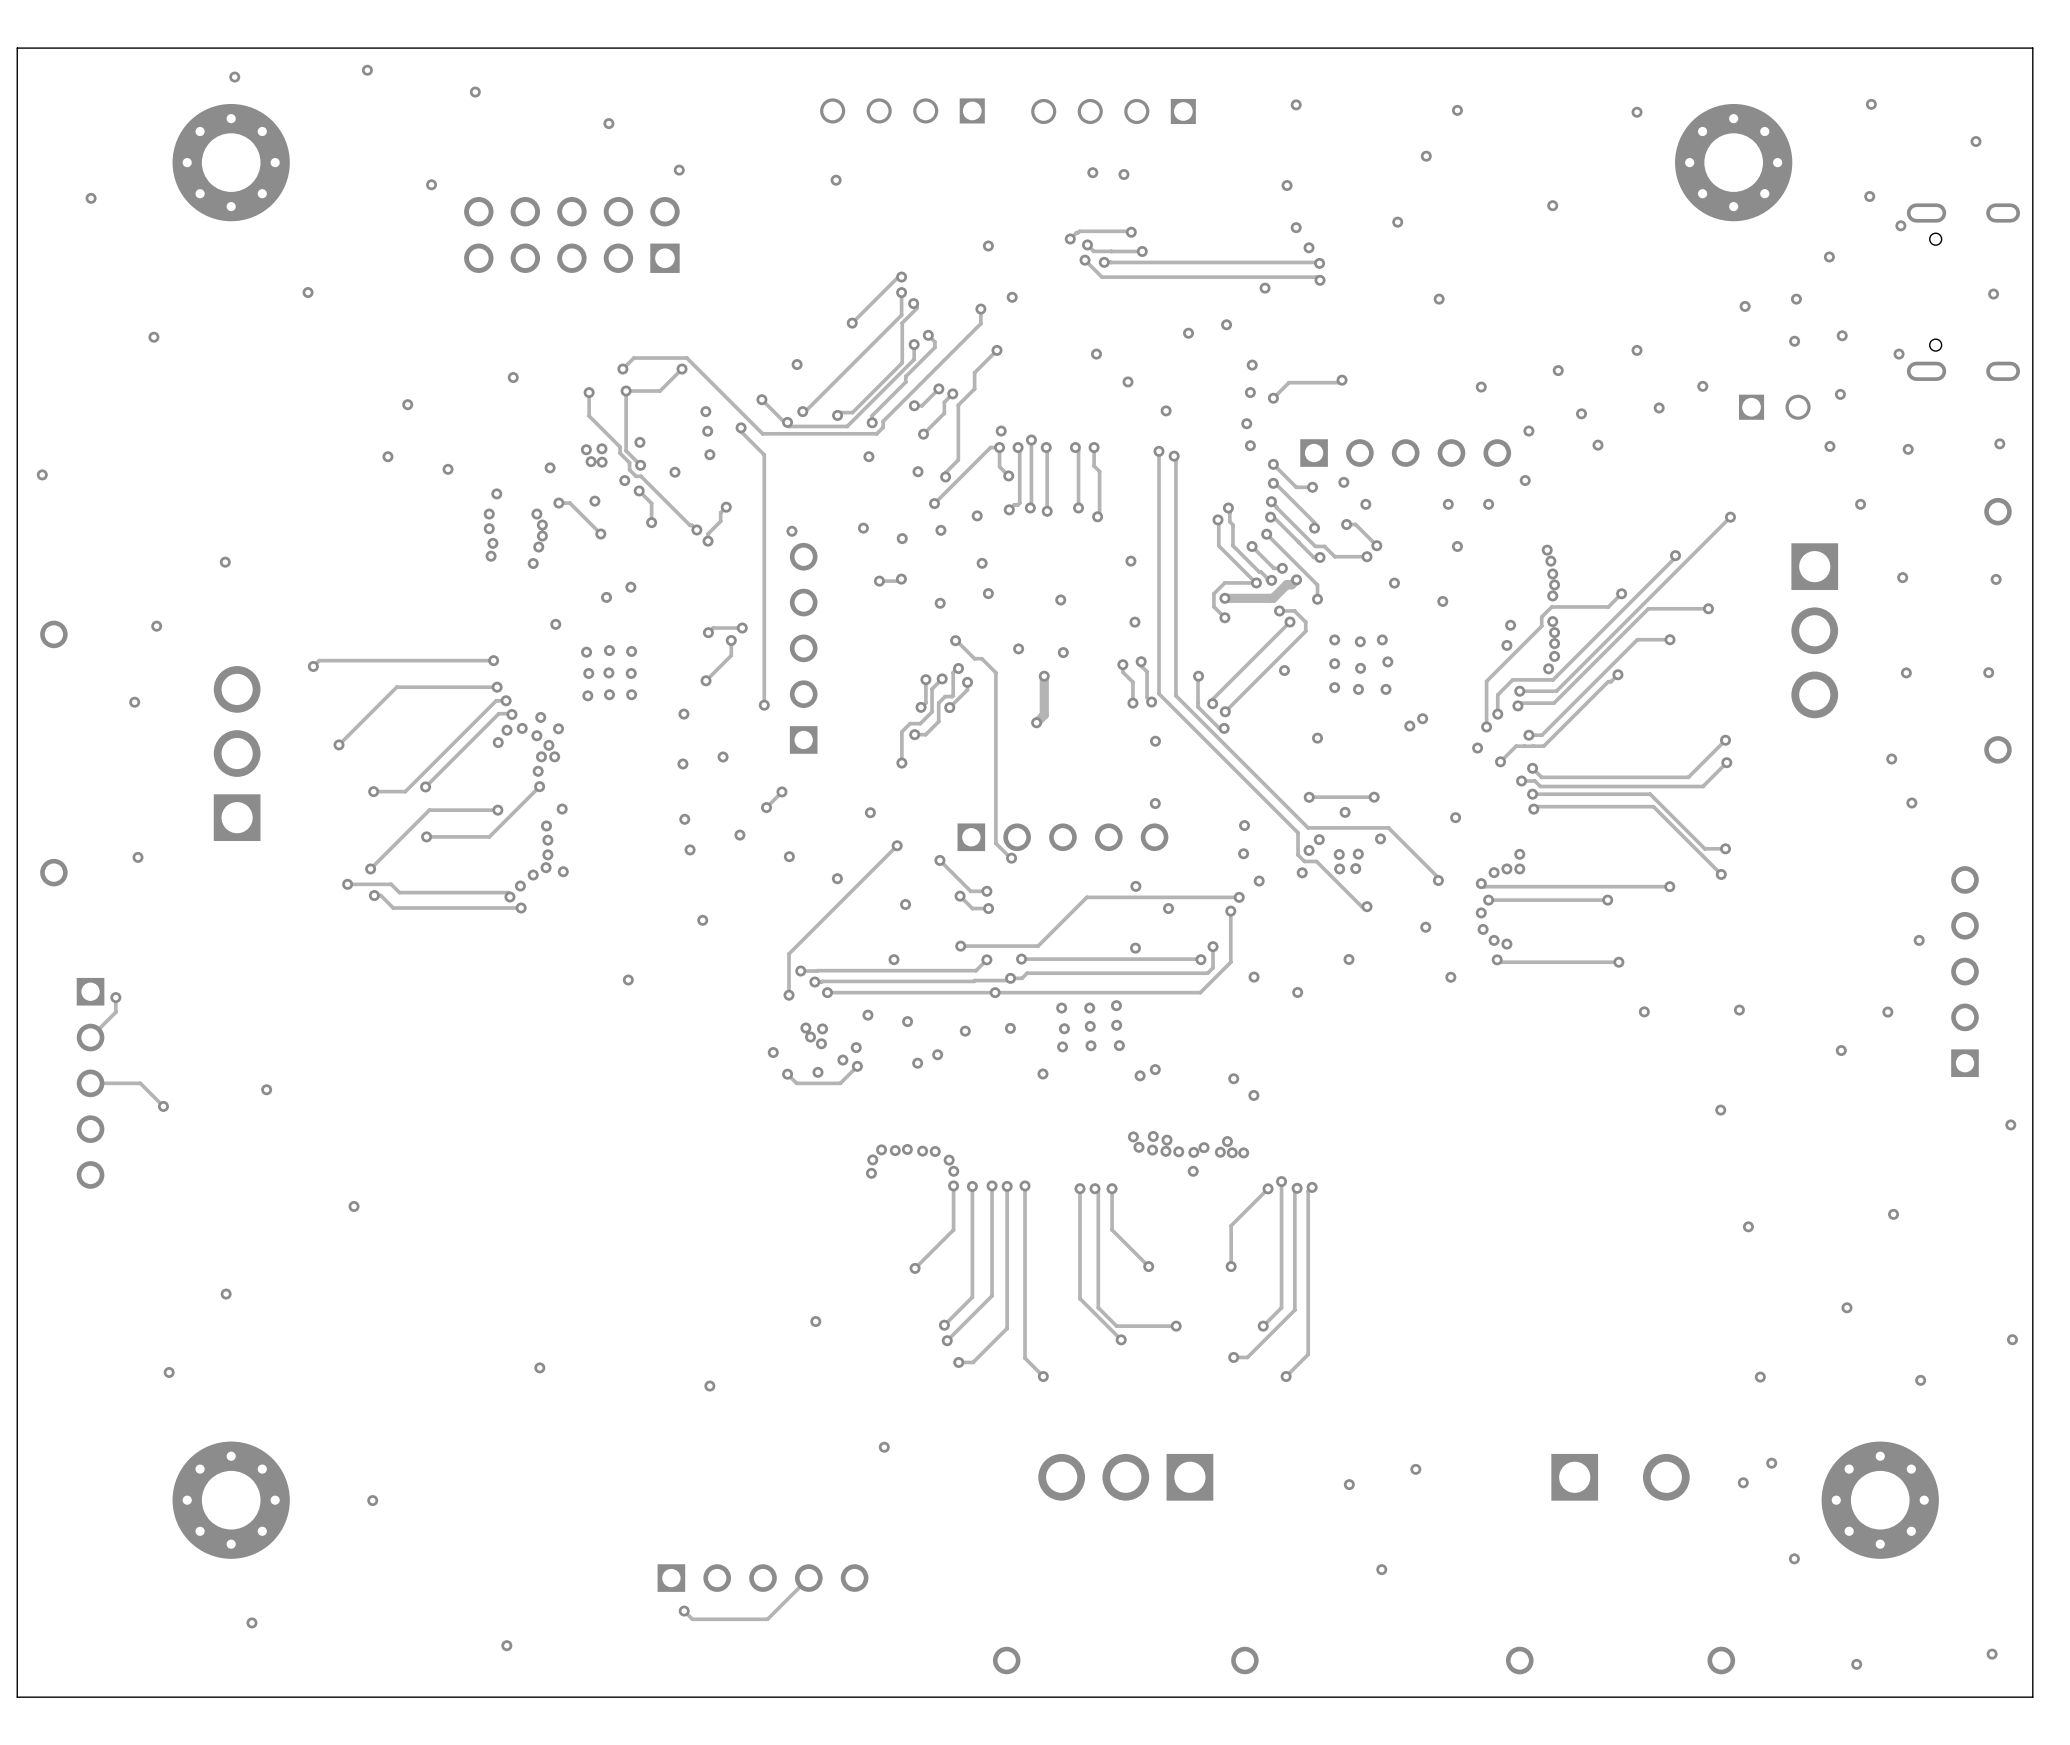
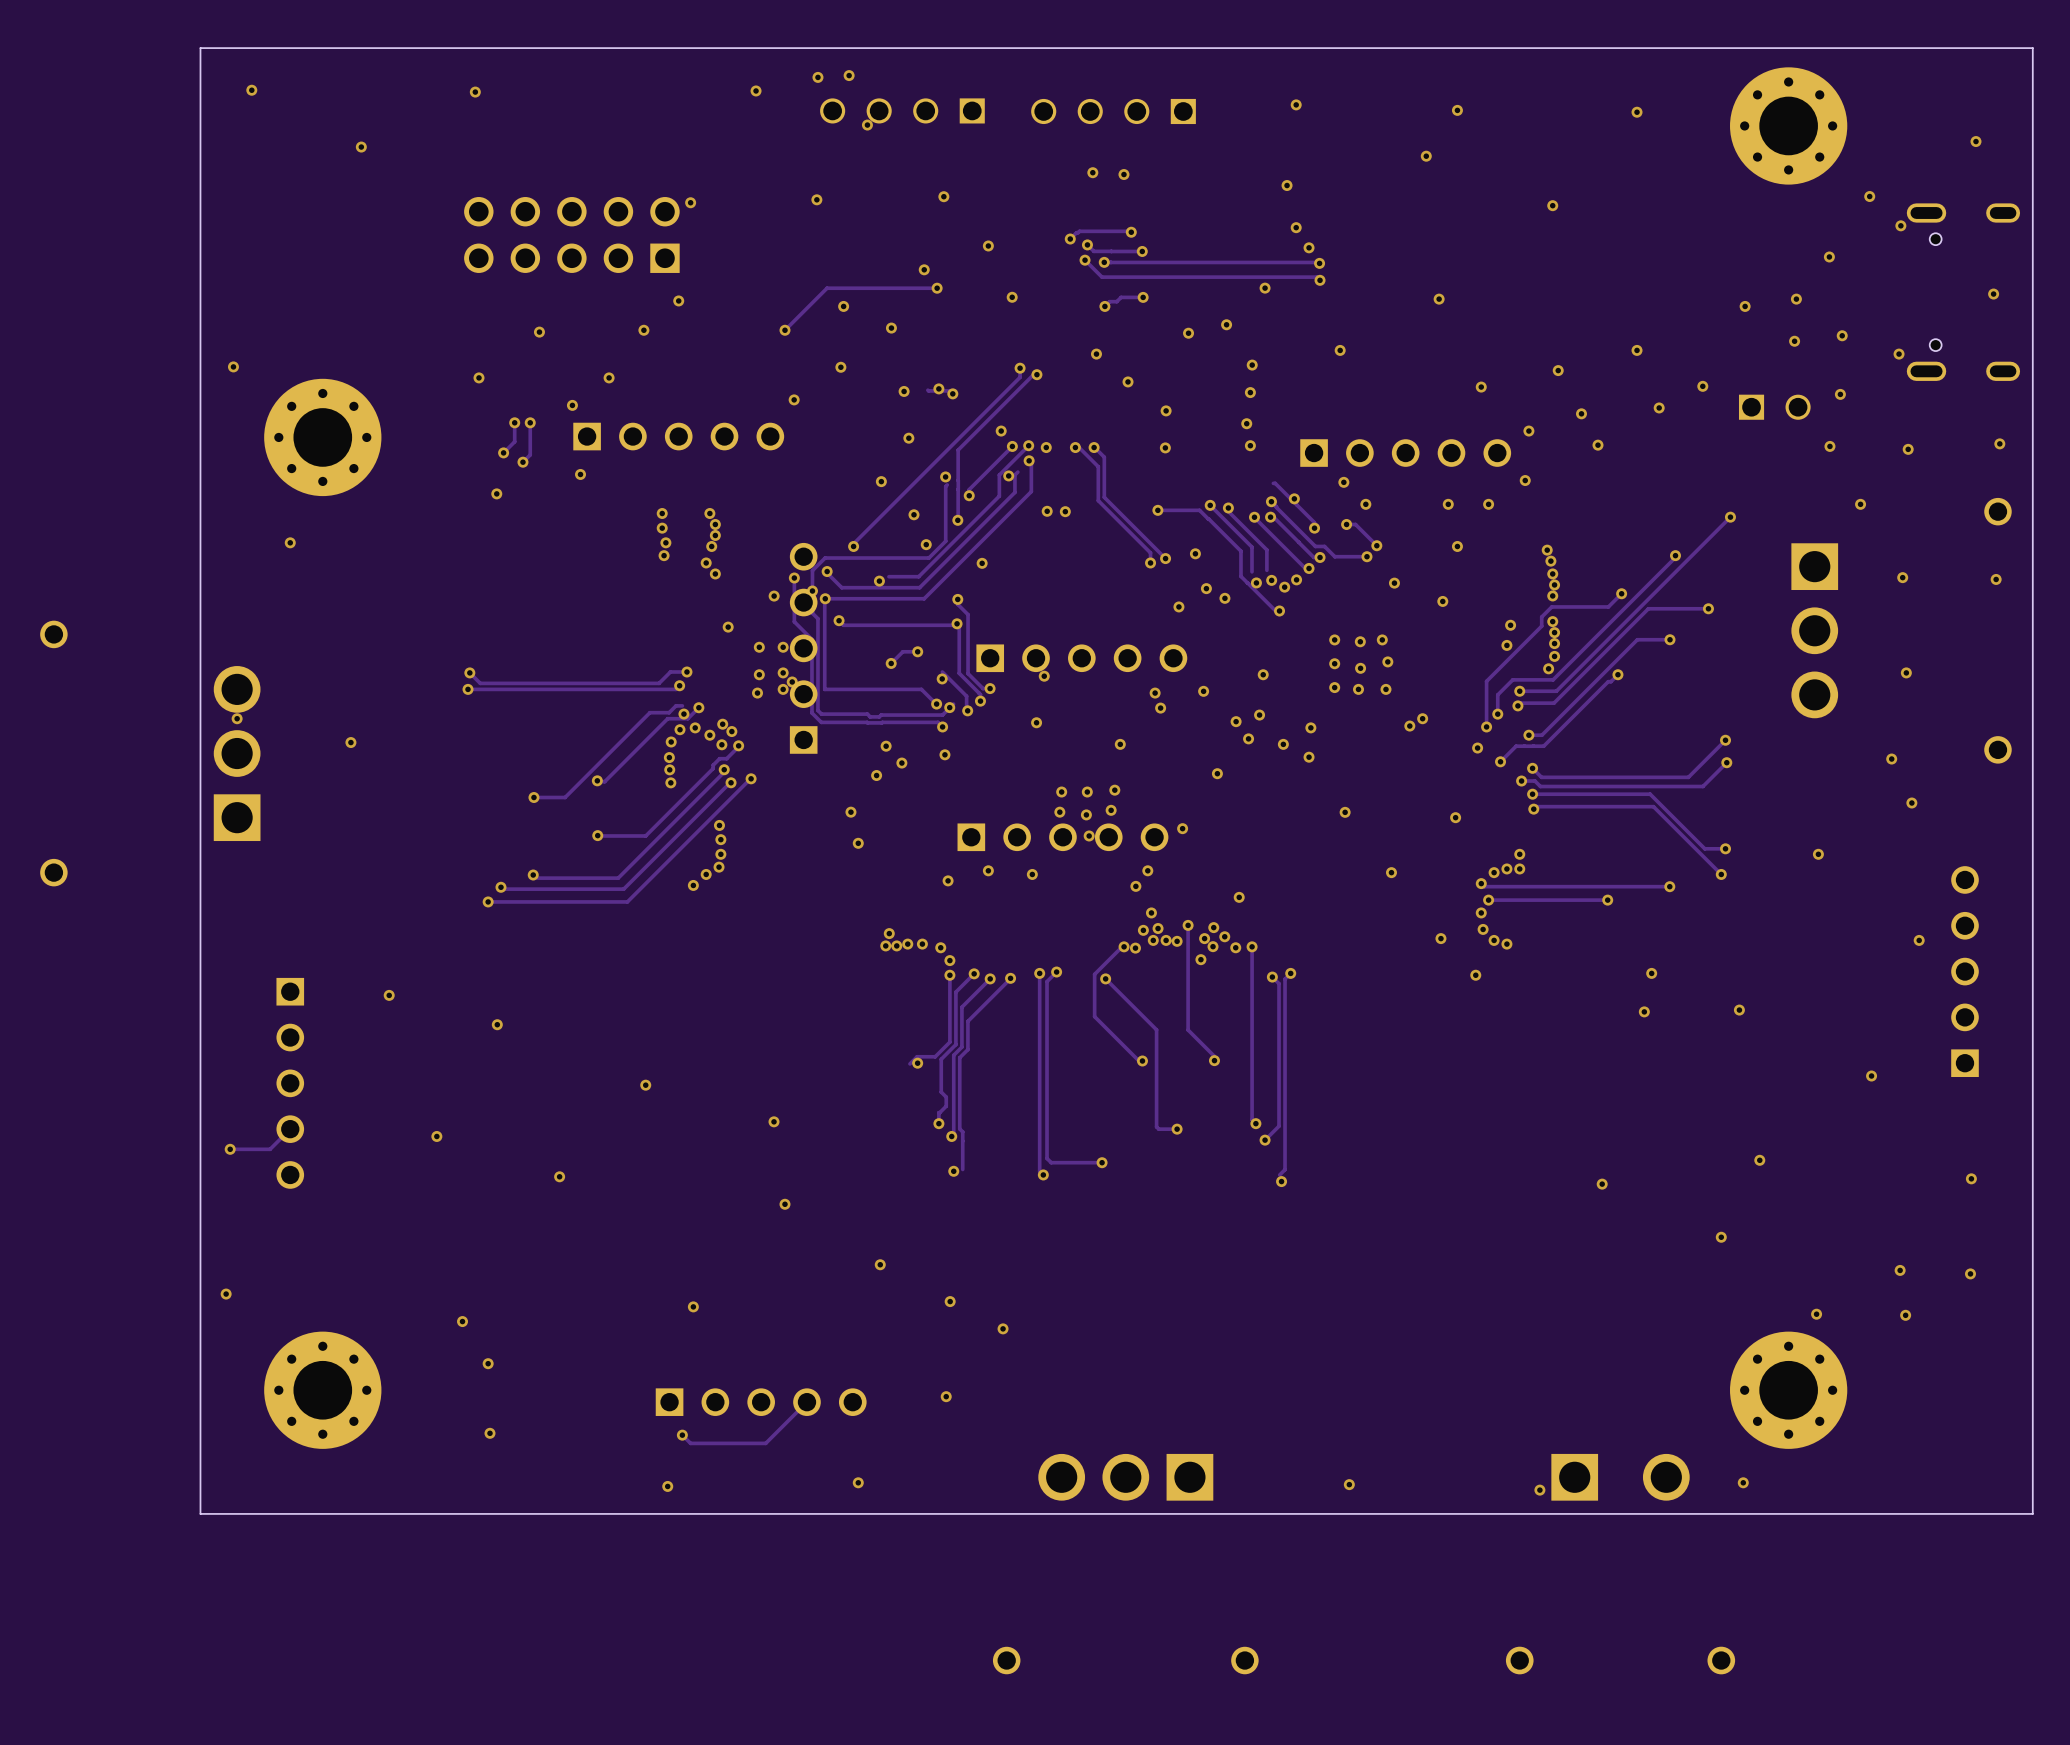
board edge: (200, 48) (17, 48) (17, 1697) (2032, 1697) (2032, 1513) -> (200, 48) (200, 1513) (2032, 1513)
via: (367, 70) -> none
via: none -> (849, 75)
via position: (234, 77) -> (251, 90)
via: none -> (817, 77)
via: none -> (756, 90)
via: (1871, 104) -> none
via: (608, 123) -> none
via: none -> (867, 125)
via: none -> (361, 147)
part position: (231, 162) -> (322, 437)
part position: (1733, 162) -> (1788, 125)
via position: (679, 170) -> (690, 202)
via position: (836, 180) -> (816, 199)
via: (431, 184) -> none
via: none -> (943, 196)
via: (91, 198) -> none
via: (1397, 222) -> none
via: none -> (924, 269)
track: (901, 277) (898, 277) (852, 323) -> none
via: (901, 277) -> none
track: none -> (937, 288) (827, 288) (784, 330)
via: none -> (937, 288)
via: (308, 292) -> none
track: (901, 292) (901, 315) (805, 411) (802, 411) -> none
via: (901, 292) -> none
track: none -> (1143, 297) (1121, 297) (1116, 301) (1109, 301) (1104, 306)
via: none -> (1143, 297)
via: none -> (678, 300)
track: (913, 303) (916, 308) (902, 323) (902, 362) (852, 412) (840, 412) (837, 415) -> none
via: (913, 303) -> none
via: none -> (1104, 306)
track: (980, 309) (980, 323) (883, 421) (883, 427) (876, 433) (762, 433) (686, 358) (633, 358) (622, 369) -> none
via: (980, 309) -> none
via position: (852, 323) -> (843, 306)
via: none -> (891, 328)
via: none -> (643, 330)
via: none -> (784, 330)
via: none -> (539, 332)
track: (928, 335) (934, 341) (934, 347) (905, 376) (905, 382) (872, 415) (872, 422) -> none
via: (928, 335) -> none
via: (153, 337) -> none
track: (914, 344) (914, 359) (847, 426) (788, 426) (761, 399) -> none
via: (914, 344) -> none
track: (996, 350) (974, 372) (974, 388) (958, 405) (958, 459) (945, 472) (945, 476) -> none
via: (996, 350) -> none
via: (797, 364) -> none
via: none -> (233, 366)
via: none -> (840, 367)
track: none -> (1020, 368) (1020, 377) (853, 543) (853, 546)
via: none -> (1020, 368)
via: (622, 369) -> none
track: (682, 369) (660, 391) (626, 391) (626, 450) (640, 465) -> none
via: (682, 369) -> none
track: none -> (1036, 374) (1033, 374) (958, 450) (957, 520)
via: none -> (1036, 374)
via: none -> (478, 377)
via: (513, 377) -> none
via: none -> (609, 377)
track: (1342, 380) (1339, 382) (1288, 382) (1273, 398) -> none
via position: (1342, 380) -> (1340, 350)
track: (938, 388) (922, 405) (914, 405) -> none
track: none -> (927, 390) (949, 390)
via: (626, 391) -> none
via: none -> (904, 391)
track: (589, 392) (589, 416) (620, 447) (620, 453) (629, 462) (629, 469) (636, 476) (640, 476) (696, 529) -> none
via: (589, 392) -> none
track: (952, 393) (944, 402) (944, 413) (923, 434) -> none
via: (1273, 398) -> none
via: (761, 399) -> none
via: none -> (794, 399)
via: (407, 404) -> none
via: none -> (572, 405)
via: (914, 405) -> none
via: (705, 411) -> none
via: (802, 411) -> none
via: (837, 415) -> none
track: none -> (514, 422) (514, 441) (503, 452)
via: none -> (514, 422)
track: none -> (530, 422) (530, 454) (522, 462)
via: none -> (530, 422)
via: (787, 422) -> none
via: (872, 422) -> none
track: (741, 427) (741, 431) (764, 454) (764, 705) -> none
via: (741, 427) -> none
via: (707, 431) -> none
via position: (923, 434) -> (908, 438)
part: none -> (678, 436)
track: (1031, 440) (1030, 507) -> none
via: (1031, 440) -> none
via: (639, 442) -> none
track: none -> (1028, 445) (999, 475) (999, 496) (918, 576) (888, 576)
via: none -> (1028, 445)
track: none -> (1012, 446) (969, 489) (969, 495)
via: none -> (1012, 446)
via: (999, 447) -> none
track: (1018, 447) (1019, 449) (1019, 503) (1009, 509) -> none
via: (1018, 447) -> none
track: (1046, 447) (1047, 511) -> none
track: (1075, 447) (1078, 450) (1078, 507) -> none
track: none -> (1076, 447) (1079, 447) (1098, 466) (1098, 500) (1150, 552) (1150, 562)
track: (1094, 447) (1094, 466) (1099, 471) (1099, 514) (1097, 516) -> (1094, 447) (1104, 457) (1104, 497) (1165, 558)
via: none -> (1165, 447)
via: (601, 448) -> none
via: (586, 449) -> none
track: (1159, 451) (1159, 693) (1298, 832) (1298, 855) (1304, 861) (1316, 861) (1361, 906) (1367, 906) -> none
via: (1159, 451) -> none
via: none -> (503, 452)
via: (709, 454) -> none
via: (387, 456) -> none
via: (868, 456) -> none
track: (1174, 456) (1175, 457) (1175, 695) (1308, 827) (1388, 827) (1438, 877) (1438, 880) -> none
via: (1174, 456) -> none
track: none -> (1029, 460) (1031, 463) (1031, 491) (924, 598) (825, 598) (823, 600)
via: none -> (1029, 460)
via: (591, 461) -> none
via: none -> (522, 462)
via: (602, 462) -> none
track: (1273, 464) (1296, 487) (1312, 487) -> none
via: (1273, 464) -> none
via: (640, 465) -> none
via: (550, 467) -> none
via: (448, 469) -> none
via: (918, 471) -> none
via: (674, 472) -> none
track: none -> (1017, 472) (1014, 474) (1014, 492) (919, 587) (841, 587) (827, 571)
via: (42, 474) -> none
via: none -> (580, 474)
track: (1008, 475) (999, 466) (999, 447) (990, 447) (934, 503) -> none
via: (624, 480) -> none
via: none -> (881, 481)
via: (1273, 483) -> none
track: none -> (947, 484) (945, 541) (928, 558) (825, 558) (812, 570) (812, 605) (812, 613) (817, 618) (817, 710) (821, 714) (867, 714) (870, 716) (879, 716) (881, 715) (942, 715) (953, 704)
via: (1312, 487) -> none
track: (639, 490) (651, 503) (651, 522) -> none
via: (639, 490) -> none
via: none -> (969, 495)
via: none -> (1294, 498)
via: (594, 501) -> none
track: (558, 503) (569, 503) (600, 534) -> none
via: (558, 503) -> none
via: (934, 503) -> none
track: none -> (1210, 505) (1251, 547) (1251, 571)
track: (726, 507) (720, 512) (720, 521) (708, 533) (708, 541) -> none
via: (726, 507) -> none
via: (1030, 507) -> none
via position: (1078, 507) -> (1065, 511)
via: (1009, 509) -> none
via: none -> (1157, 510)
track: (1228, 511) (1229, 521) (1232, 524) (1232, 545) (1267, 580) -> (1228, 511) (1266, 549) (1266, 570)
via: none -> (662, 513)
via: none -> (709, 513)
via: (489, 514) -> none
via: (536, 514) -> none
via: none -> (913, 514)
via: (977, 515) -> none
via: (1097, 516) -> none
track: (1218, 517) (1218, 545) (1254, 581) (1258, 581) (1247, 582) -> (1157, 510) (1199, 510) (1240, 551) (1240, 576) (1247, 582)
track: none -> (1254, 517) (1305, 568) (1309, 568)
via: none -> (1254, 517)
via position: (1217, 519) -> (1210, 505)
via: none -> (957, 520)
via: (651, 522) -> none
via: none -> (715, 524)
via: (542, 525) -> none
via: (489, 528) -> none
via: none -> (662, 528)
via position: (863, 528) -> (853, 546)
via: (696, 529) -> none
via: (940, 530) -> none
via: (791, 531) -> none
via: (600, 534) -> none
track: (1266, 534) (1317, 585) (1317, 599) -> none
via: (1266, 534) -> none
via: none -> (715, 535)
via: (542, 536) -> none
via: (902, 538) -> none
via: (708, 541) -> none
via: none -> (290, 542)
via: none -> (665, 542)
via: (492, 543) -> none
via: none -> (926, 544)
via: none -> (711, 546)
track: (1252, 546) (1273, 568) (1282, 568) -> none
via: (1252, 546) -> none
via: (538, 547) -> none
via: none -> (1195, 553)
via: none -> (664, 555)
via: (491, 556) -> none
via: none -> (1165, 558)
via: (1130, 561) -> none
via: (225, 562) -> none
via: none -> (706, 562)
via: none -> (1150, 562)
via: (533, 563) -> none
via: (1282, 568) -> none
via: none -> (1309, 568)
via: none -> (827, 571)
via: none -> (715, 573)
track: none -> (794, 578) (794, 621) (811, 639) (811, 712) (821, 722) (938, 722) (942, 726)
via: none -> (794, 578)
track: (901, 579) (899, 581) (879, 581) -> none
via: (901, 579) -> none
track: (1296, 579) (1291, 584) (1286, 584) (1273, 598) (1224, 598) -> none
track: (1247, 582) (1224, 582) (1213, 593) (1213, 606) (1224, 617) -> (1247, 582) (1279, 614)
via: (630, 587) -> none
via: none -> (1284, 587)
via: none -> (1206, 588)
via: none -> (812, 591)
via: (988, 593) -> none
via: none -> (774, 596)
via: (606, 597) -> none
via: none -> (825, 598)
track: none -> (957, 599) (957, 604) (968, 614) (968, 673) (983, 688) (990, 688)
via: none -> (957, 599)
via: (1060, 599) -> none
via: (1317, 599) -> none
track: none -> (823, 601) (824, 602) (824, 689) (921, 689) (936, 704)
via: (940, 603) -> none
via: none -> (1178, 606)
track: (1279, 610) (1294, 610) (1305, 622) (1305, 631) (1225, 711) -> none
via: (1224, 617) -> none
track: none -> (839, 620) (843, 625) (957, 623) (959, 626) (959, 673) (980, 694) (980, 701)
via: none -> (839, 620)
via: (1134, 622) -> none
track: (1290, 622) (1212, 699) (1212, 703) -> none
via: (1290, 622) -> none
via: none -> (957, 623)
via: (555, 624) -> none
via: (156, 626) -> none
via: none -> (728, 627)
track: (742, 628) (713, 628) (708, 632) -> none
via: (742, 628) -> none
via: (708, 632) -> none
track: (731, 640) (731, 655) (706, 680) -> none
via: (731, 640) -> none
track: (955, 640) (974, 658) (981, 658) (995, 672) (995, 843) (1011, 858) -> none
via: (955, 640) -> none
via: none -> (759, 647)
via: none -> (783, 647)
via: (1018, 648) -> none
via: (609, 650) -> none
via: (631, 651) -> none
track: none -> (917, 651) (902, 651) (891, 663)
via: none -> (917, 651)
via: (586, 652) -> none
via: (1063, 652) -> none
part: none -> (1081, 658)
track: (493, 660) (319, 660) (313, 666) -> none
via: (493, 660) -> none
track: (1141, 661) (1141, 665) (1147, 671) (1147, 697) (1151, 702) -> none
via: (1141, 661) -> none
via: none -> (891, 663)
track: (1122, 664) (1122, 672) (1132, 682) (1132, 703) -> none
via: (1122, 664) -> none
via: (313, 666) -> none
track: (958, 668) (953, 672) (953, 695) (945, 696) (938, 703) (938, 721) (925, 734) (914, 734) -> none
via: (958, 668) -> none
via position: (1284, 670) -> (1263, 674)
track: none -> (686, 671) (670, 671) (659, 683) (480, 683) (469, 672)
via: none -> (686, 671)
track: none -> (942, 671) (966, 696) (967, 710)
via: none -> (469, 672)
via: (608, 672) -> none
via: none -> (783, 672)
via: (1988, 672) -> none
via: (588, 673) -> none
via: (631, 673) -> none
via: none -> (759, 674)
track: (1044, 676) (1044, 715) (1036, 722) -> none
track: (1198, 676) (1198, 707) (1219, 728) (1224, 728) -> none
via: (1198, 676) -> none
track: (942, 678) (932, 689) (932, 711) (920, 723) (910, 723) (901, 731) (901, 763) -> none
track: (925, 679) (925, 702) (921, 707) -> none
via: (925, 679) -> none
via: (706, 680) -> none
via: none -> (792, 681)
track: (967, 682) (967, 689) (949, 707) -> none
via: (967, 682) -> none
track: none -> (679, 685) (675, 689) (468, 689)
via: none -> (679, 685)
track: (497, 687) (396, 687) (339, 744) -> none
via: (497, 687) -> none
via: none -> (990, 688)
via: none -> (468, 689)
via: none -> (783, 689)
via: none -> (1203, 691)
via: none -> (757, 693)
via: none -> (1155, 693)
via: (609, 694) -> none
via: (631, 694) -> none
via: (587, 695) -> none
track: (506, 700) (496, 700) (405, 791) (373, 791) -> none
via: (506, 700) -> none
via: none -> (980, 701)
via: (134, 702) -> none
via: (1151, 702) -> none
via: (1132, 703) -> none
via: (1212, 703) -> none
via: none -> (936, 704)
track: none -> (682, 705) (675, 705) (669, 712) (649, 712) (565, 797) (533, 797)
via: (764, 705) -> none
track: none -> (698, 707) (687, 718) (667, 718) (604, 781) (597, 780)
via: none -> (698, 707)
via: (921, 707) -> none
via: none -> (1160, 708)
via: none -> (967, 710)
via position: (1225, 711) -> (1236, 721)
track: (511, 714) (498, 713) (425, 786) -> none
via: (511, 714) -> none
via: none -> (1259, 715)
via: (540, 717) -> none
via: none -> (237, 718)
via: none -> (722, 724)
via: none -> (942, 726)
via: none -> (695, 727)
via: (522, 728) -> none
via: (558, 728) -> none
via: (1224, 728) -> none
via: none -> (680, 729)
via: (507, 730) -> none
via: none -> (731, 731)
via: (914, 734) -> none
via: (536, 735) -> none
via: none -> (709, 735)
via: none -> (1248, 738)
via position: (1317, 738) -> (1310, 727)
via: none -> (671, 741)
via: (1155, 741) -> none
via: (498, 742) -> none
via position: (339, 744) -> (350, 742)
via: none -> (721, 744)
via: none -> (1120, 744)
via: none -> (1283, 744)
via: (548, 745) -> none
track: none -> (738, 745) (726, 758) (719, 758) (713, 765) (713, 768) (645, 835) (597, 835)
via: none -> (738, 745)
via: none -> (886, 746)
via: none -> (944, 754)
via: (541, 756) -> none
via: (554, 756) -> none
via: none -> (669, 757)
via: (723, 757) -> none
via: none -> (1309, 757)
via: (682, 763) -> none
via: none -> (669, 769)
track: none -> (724, 769) (723, 773) (618, 878) (537, 878)
via: none -> (724, 769)
via: (538, 771) -> none
via: none -> (1217, 773)
via: none -> (876, 775)
track: none -> (751, 778) (627, 901) (488, 901)
via: none -> (751, 778)
via: none -> (597, 780)
via: none -> (670, 782)
track: none -> (731, 782) (623, 889) (502, 889) (500, 887)
via: none -> (731, 782)
via: (425, 786) -> none
track: (539, 786) (489, 836) (426, 836) -> none
via position: (539, 786) -> (533, 797)
via: none -> (1114, 790)
via: (373, 791) -> none
via: (781, 791) -> none
track: (781, 792) (766, 807) -> none
via: none -> (1061, 792)
via: none -> (1087, 792)
via: (1309, 797) -> none
track: (1374, 797) (1309, 797) -> none
via: (1374, 797) -> none
via: (1155, 803) -> none
via: (766, 807) -> none
via: (562, 809) -> none
track: (497, 810) (429, 810) (370, 868) -> none
via: (497, 810) -> none
via: none -> (1111, 810)
via: none -> (850, 812)
via: (870, 812) -> none
via: none -> (1059, 812)
via: none -> (1086, 814)
via: (684, 819) -> none
via: (546, 825) -> none
via: none -> (719, 825)
via: (1244, 825) -> none
via: none -> (1182, 828)
via: none -> (597, 835)
via: (739, 835) -> none
via: none -> (1089, 835)
via: (426, 836) -> none
via: (1380, 838) -> none
via: none -> (720, 839)
via: (1319, 839) -> none
via: (547, 840) -> none
via: none -> (858, 843)
track: (897, 845) (789, 953) (789, 995) -> none
via: (897, 845) -> none
via: (690, 849) -> none
via: (1309, 850) -> none
via: (1243, 853) -> none
via: (547, 854) -> none
via: none -> (720, 854)
via: (1339, 854) -> none
via: (1358, 854) -> none
via: none -> (1818, 854)
via: (789, 856) -> none
via: (138, 857) -> none
via: (1011, 858) -> none
track: (939, 860) (970, 891) (986, 891) -> none
via: (939, 860) -> none
via: (546, 867) -> none
via: none -> (719, 867)
via: (370, 868) -> none
via: (1339, 868) -> none
via: (1355, 868) -> none
via: none -> (988, 870)
via: none -> (1147, 870)
via: (563, 871) -> none
via: (1302, 872) -> none
via: none -> (1391, 872)
via: none -> (706, 874)
via: none -> (1032, 874)
via: (837, 878) -> none
via: none -> (948, 880)
via: (1438, 880) -> none
via: (1259, 881) -> none
track: (347, 884) (391, 884) (399, 892) (507, 892) (509, 897) -> none
via: (347, 884) -> none
via: none -> (693, 885)
via: (520, 886) -> none
via: (986, 891) -> none
track: (374, 895) (380, 895) (393, 908) (521, 908) -> none
via: (374, 895) -> none
track: (960, 896) (972, 908) (988, 908) -> none
via: (960, 896) -> none
via position: (509, 897) -> (500, 887)
track: (1239, 897) (1086, 897) (1038, 946) (960, 946) -> none
via: none -> (488, 901)
via: (905, 904) -> none
via: (1367, 906) -> none
via: (521, 908) -> none
via: (988, 908) -> none
via: (1168, 908) -> none
track: (1230, 911) (1230, 962) (1200, 992) (827, 992) -> none
via: (1230, 911) -> none
via: none -> (1151, 912)
via: (702, 920) -> none
track: none -> (1188, 925) (1188, 1030) (1214, 1056) (1214, 1060)
via: none -> (1188, 925)
via: none -> (1213, 927)
via position: (1425, 927) -> (1440, 938)
via: none -> (1158, 928)
via: none -> (1143, 930)
via: none -> (889, 933)
via: none -> (1224, 936)
via: none -> (1204, 938)
via: none -> (1153, 940)
via: none -> (1166, 940)
via: none -> (1177, 941)
via: none -> (907, 944)
via: none -> (922, 944)
via: none -> (885, 945)
via: none -> (896, 945)
via: (960, 946) -> none
track: none -> (1124, 946) (1094, 974) (1094, 1016) (1138, 1060) (1142, 1060)
via: none -> (1124, 946)
track: (1213, 946) (1213, 967) (1207, 973) (1027, 973) (1022, 978) (1010, 978) (1008, 980) (814, 982) -> none
track: none -> (1252, 946) (1252, 1119) (1255, 1123)
via: none -> (1252, 946)
via: none -> (940, 947)
via: none -> (1235, 947)
via: (894, 959) -> none
track: (986, 959) (976, 970) (800, 971) -> none
via: (986, 959) -> none
track: (1021, 959) (1200, 959) -> none
via: (1021, 959) -> none
via: (1348, 959) -> none
track: (1497, 959) (1499, 962) (1618, 962) -> none
via: (1497, 959) -> none
via: none -> (949, 960)
via position: (1618, 962) -> (1651, 973)
via: (800, 971) -> none
track: none -> (1056, 972) (1047, 981) (1047, 1158) (1051, 1162) (1102, 1162)
via: none -> (1056, 972)
track: none -> (974, 973) (955, 992) (955, 1044) (941, 1059) (941, 1092) (946, 1097) (946, 1106) (938, 1112) (938, 1123)
via: none -> (974, 973)
track: none -> (1039, 973) (1039, 1171) (1043, 1174)
via: none -> (1039, 973)
track: none -> (1290, 973) (1285, 979) (1285, 1169) (1279, 1174)
via: none -> (1290, 973)
track: none -> (949, 975) (949, 1042) (935, 1056) (917, 1056) (909, 1063)
via: none -> (949, 975)
via: none -> (1475, 975)
track: none -> (1012, 977) (967, 1021) (967, 1049) (959, 1057) (959, 1128) (962, 1131) (962, 1169)
via: (1254, 977) -> none
track: none -> (1272, 977) (1279, 983) (1279, 1126) (1265, 1140)
via: none -> (1272, 977)
via: (1450, 977) -> none
track: none -> (990, 978) (961, 1007) (961, 1047) (953, 1055) (953, 1134) (951, 1136)
via: none -> (990, 978)
track: none -> (1105, 978) (1156, 1029) (1156, 1126) (1158, 1129) (1177, 1129)
via: none -> (1105, 978)
via: (628, 980) -> none
via: (814, 982) -> none
via: (827, 992) -> none
via: (995, 992) -> none
via: (1297, 992) -> none
via: none -> (389, 995)
via: (789, 995) -> none
track: (115, 997) (115, 1012) (90, 1037) -> none
via: (115, 997) -> none
via: (1116, 1005) -> none
via: (1061, 1008) -> none
via: (1089, 1008) -> none
via: (1887, 1012) -> none
via: (867, 1015) -> none
via: (907, 1021) -> none
via: none -> (497, 1024)
via: (1116, 1025) -> none
via: (1090, 1026) -> none
via: (805, 1028) -> none
via: (822, 1028) -> none
via: (1010, 1028) -> none
via: (1064, 1028) -> none
via: (965, 1031) -> none
via: (810, 1037) -> none
via: (821, 1043) -> none
via: (1090, 1045) -> none
via: (1119, 1045) -> none
via: (1062, 1046) -> none
via: (856, 1047) -> none
via: (1841, 1050) -> none
via: (773, 1052) -> none
via: (937, 1054) -> none
via: (842, 1060) -> none
via: none -> (1142, 1060)
via: none -> (1214, 1060)
track: (857, 1066) (840, 1083) (796, 1083) (787, 1074) -> none
via: (857, 1066) -> none
via: (1155, 1069) -> none
via: (817, 1072) -> none
via: (787, 1074) -> none
via: (1042, 1074) -> none
via: (1140, 1075) -> none
via: none -> (1871, 1076)
via: (1233, 1078) -> none
track: (90, 1083) (140, 1083) (163, 1106) -> none
part position: (90, 1083) -> (290, 1083)
via: none -> (645, 1085)
via: (266, 1089) -> none
via: (1253, 1095) -> none
via: (163, 1106) -> none
via: (1720, 1110) -> none
via: none -> (774, 1121)
via: none -> (938, 1123)
via: none -> (1255, 1123)
via: (2010, 1124) -> none
track: none -> (290, 1129) (270, 1149) (230, 1149)
via: none -> (436, 1136)
via: none -> (951, 1136)
via: (1133, 1136) -> none
via: (1153, 1136) -> none
via position: (1167, 1140) -> (1177, 1129)
via: none -> (1265, 1140)
via: (1227, 1141) -> none
via: (1138, 1147) -> none
via: (1204, 1147) -> none
via: none -> (230, 1149)
via: (881, 1149) -> none
via: (907, 1149) -> none
via: (895, 1150) -> none
via: (1152, 1150) -> none
via: (922, 1151) -> none
via: (935, 1151) -> none
via: (1165, 1151) -> none
via: (1178, 1151) -> none
via: (1193, 1152) -> none
via: (1220, 1152) -> none
via: (1232, 1152) -> none
via: (1243, 1152) -> none
via: (872, 1159) -> none
via: (949, 1160) -> none
via: none -> (1759, 1160)
via: none -> (1102, 1162)
via: (1193, 1171) -> none
via: (871, 1173) -> none
via: none -> (1043, 1174)
via: none -> (559, 1176)
via: none -> (1971, 1178)
track: (1281, 1181) (1281, 1307) (1263, 1326) -> none
via: none -> (1602, 1184)
track: (953, 1185) (953, 1229) (915, 1268) -> none
via: (953, 1185) -> none
track: (992, 1185) (992, 1295) (947, 1340) -> none
via: (992, 1185) -> none
track: (1025, 1185) (1025, 1358) (1043, 1376) -> none
via: (1025, 1185) -> none
track: (972, 1186) (972, 1297) (944, 1325) -> none
via: (972, 1186) -> none
track: (1007, 1186) (1007, 1328) (973, 1362) (958, 1362) -> none
via: (1007, 1186) -> none
track: (1312, 1187) (1308, 1191) (1308, 1354) (1286, 1376) -> none
via: (1312, 1187) -> none
track: (1079, 1188) (1079, 1298) (1121, 1339) -> none
via: (1079, 1188) -> none
track: (1095, 1188) (1098, 1192) (1098, 1307) (1116, 1326) (1176, 1326) -> none
via: (1095, 1188) -> none
track: (1112, 1188) (1112, 1229) (1148, 1266) -> none
via: (1112, 1188) -> none
track: (1268, 1188) (1231, 1225) (1231, 1266) -> none
via: (1268, 1188) -> none
track: (1297, 1188) (1294, 1190) (1294, 1310) (1247, 1357) (1233, 1357) -> none
via: (1297, 1188) -> none
via: none -> (784, 1204)
via: (354, 1206) -> none
via: (1893, 1214) -> none
via position: (1748, 1226) -> (1721, 1237)
via: none -> (880, 1264)
via: (1148, 1266) -> none
via: (1231, 1266) -> none
via: (915, 1268) -> none
via: none -> (1900, 1270)
via: none -> (1970, 1273)
via: none -> (950, 1301)
via: none -> (693, 1306)
via: (1847, 1307) -> none
via: none -> (1816, 1314)
via: none -> (1905, 1315)
via: none -> (462, 1321)
via: (815, 1321) -> none
via: (944, 1325) -> none
via: (1176, 1326) -> none
via: (1263, 1326) -> none
via: none -> (1003, 1328)
via: (1121, 1339) -> none
via: (2012, 1339) -> none
via: (947, 1340) -> none
via: (1233, 1357) -> none
via: (958, 1362) -> none
via: none -> (488, 1363)
via: (539, 1367) -> none
via: (169, 1372) -> none
via: (1043, 1376) -> none
via: (1286, 1376) -> none
via: (1760, 1377) -> none
via: (1920, 1380) -> none
via: (709, 1386) -> none
via: none -> (946, 1396)
via: none -> (489, 1433)
via: none -> (682, 1435)
via: (884, 1447) -> none
via: (1771, 1463) -> none
via: (1415, 1469) -> none
via: none -> (858, 1482)
via: none -> (667, 1486)
via: none -> (1539, 1490)
part position: (231, 1500) -> (322, 1390)
via: (372, 1500) -> none
part position: (1880, 1500) -> (1788, 1390)
via: (1794, 1558) -> none
via: (1381, 1569) -> none
part position: (763, 1578) -> (761, 1402)
track: (808, 1578) (767, 1619) (692, 1619) (684, 1611) -> (806, 1402) (765, 1443) (690, 1443) (682, 1435)
via: (684, 1611) -> none
via: (251, 1622) -> none
via: (506, 1645) -> none
via: (1992, 1654) -> none
via: (1856, 1664) -> none

